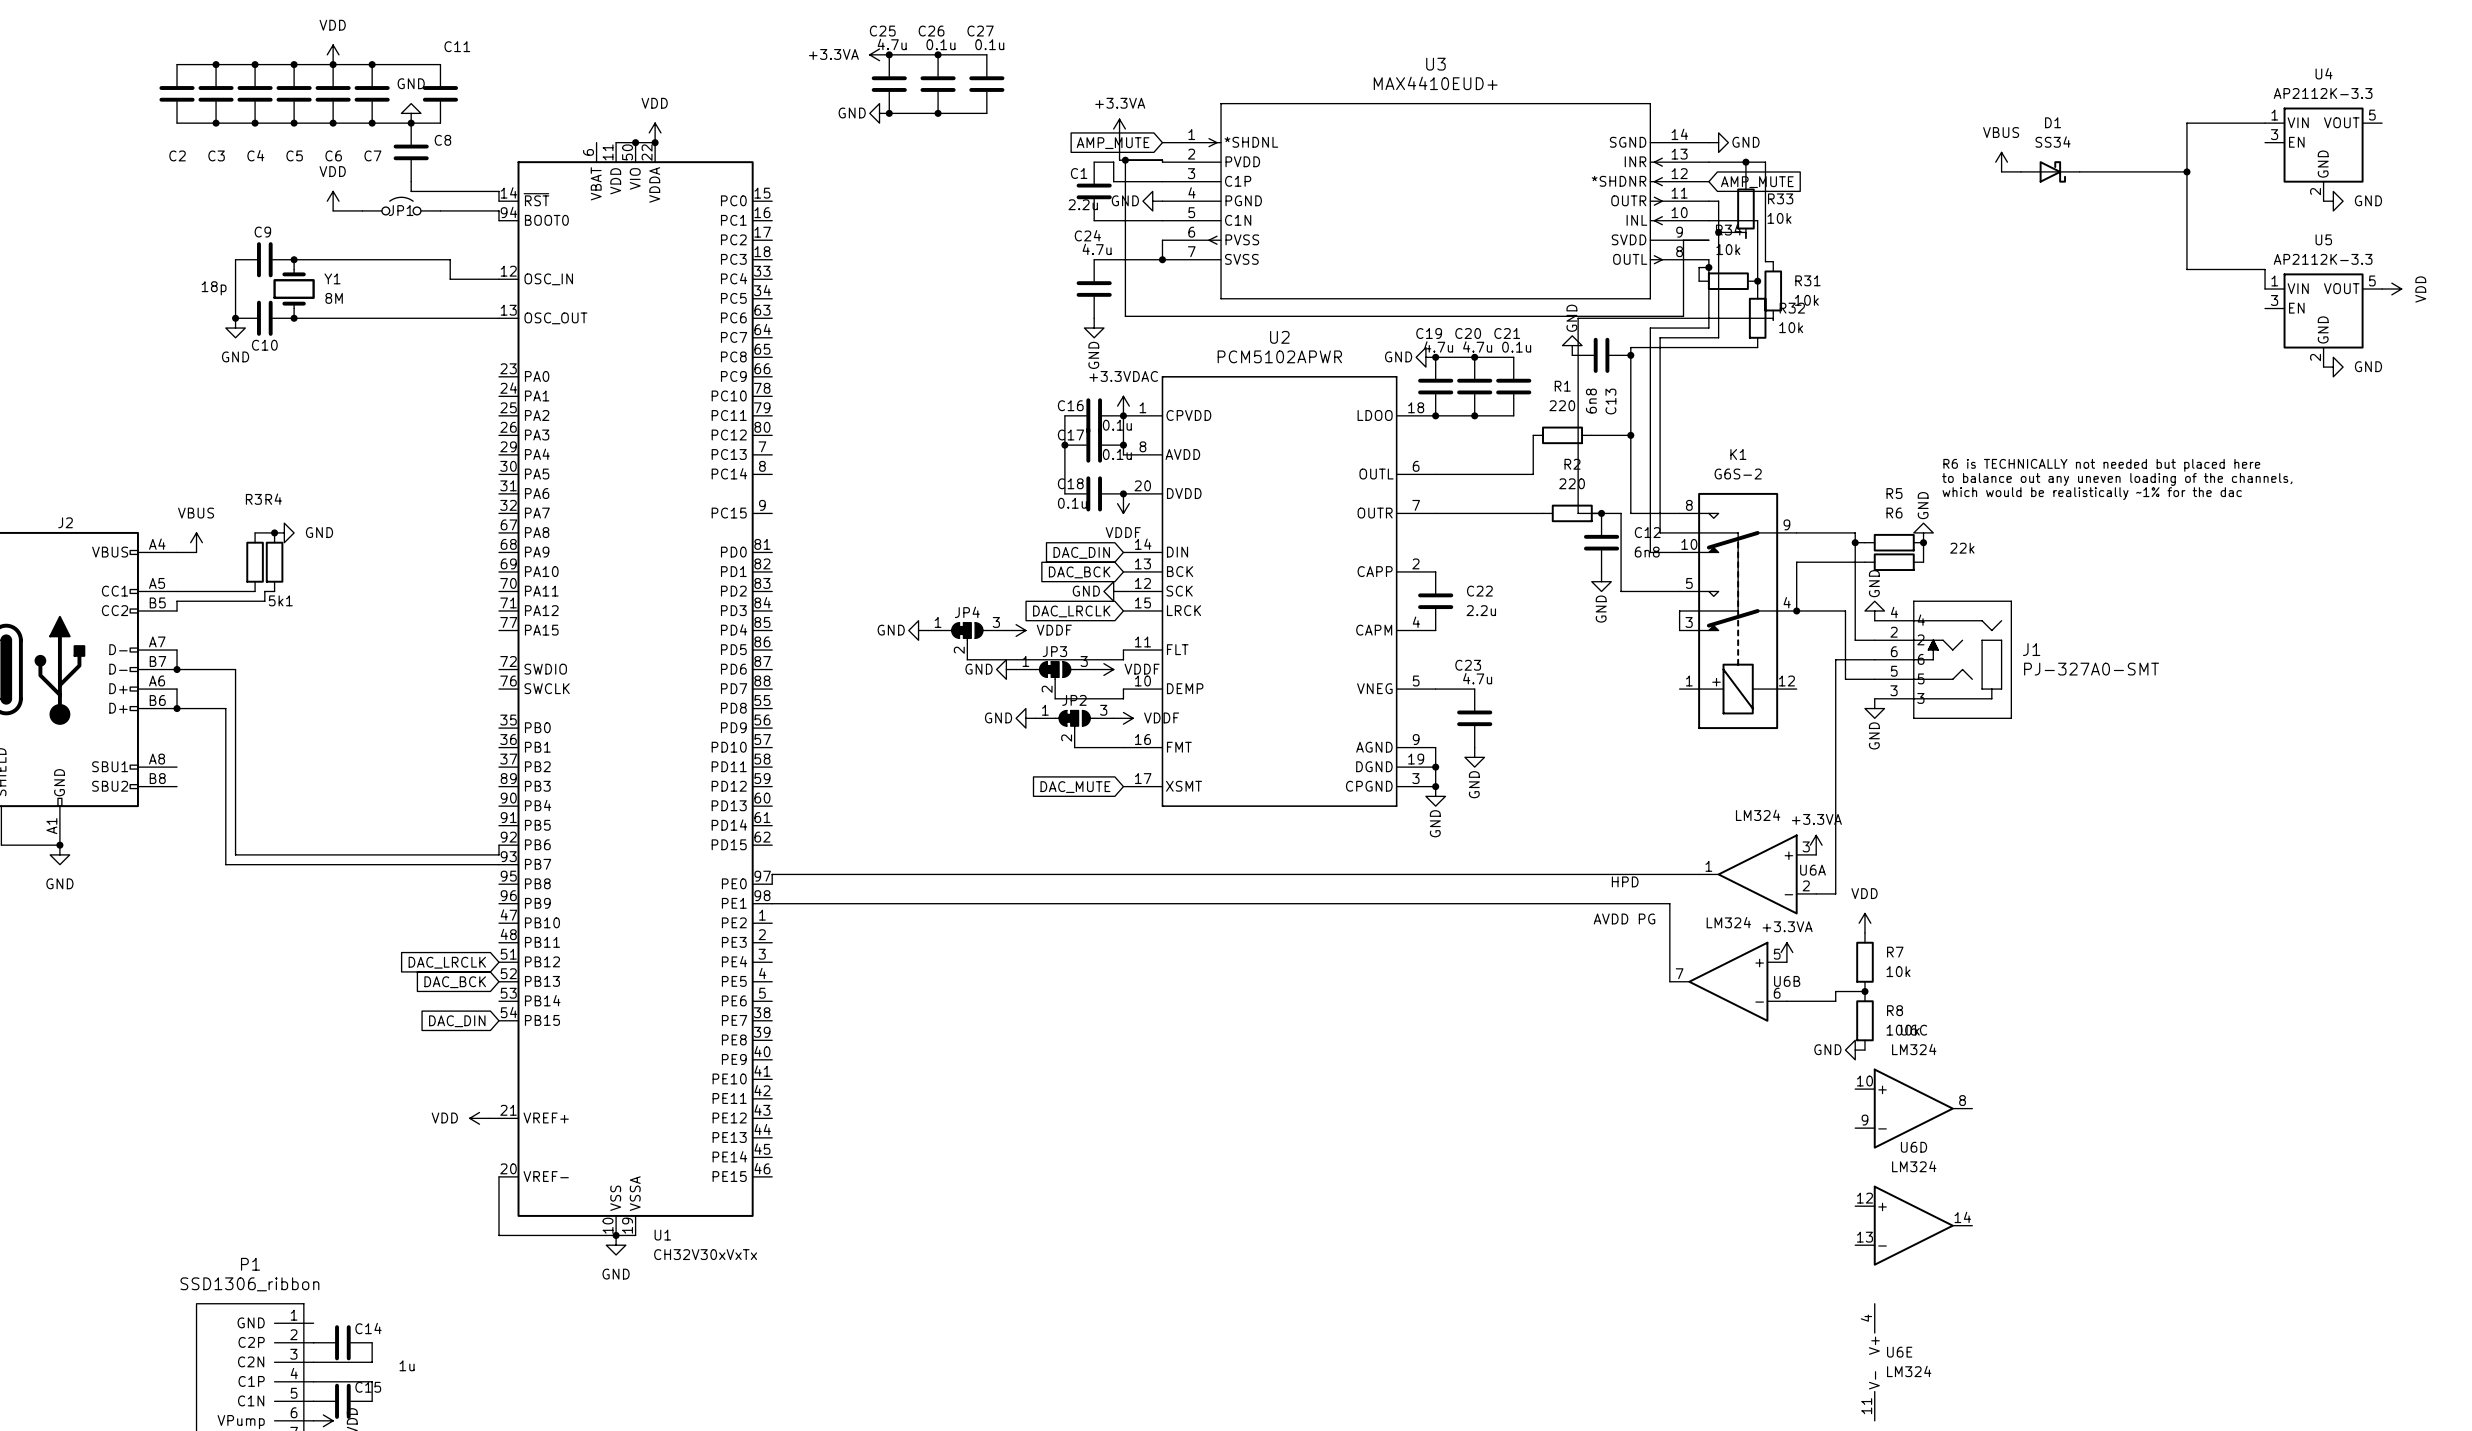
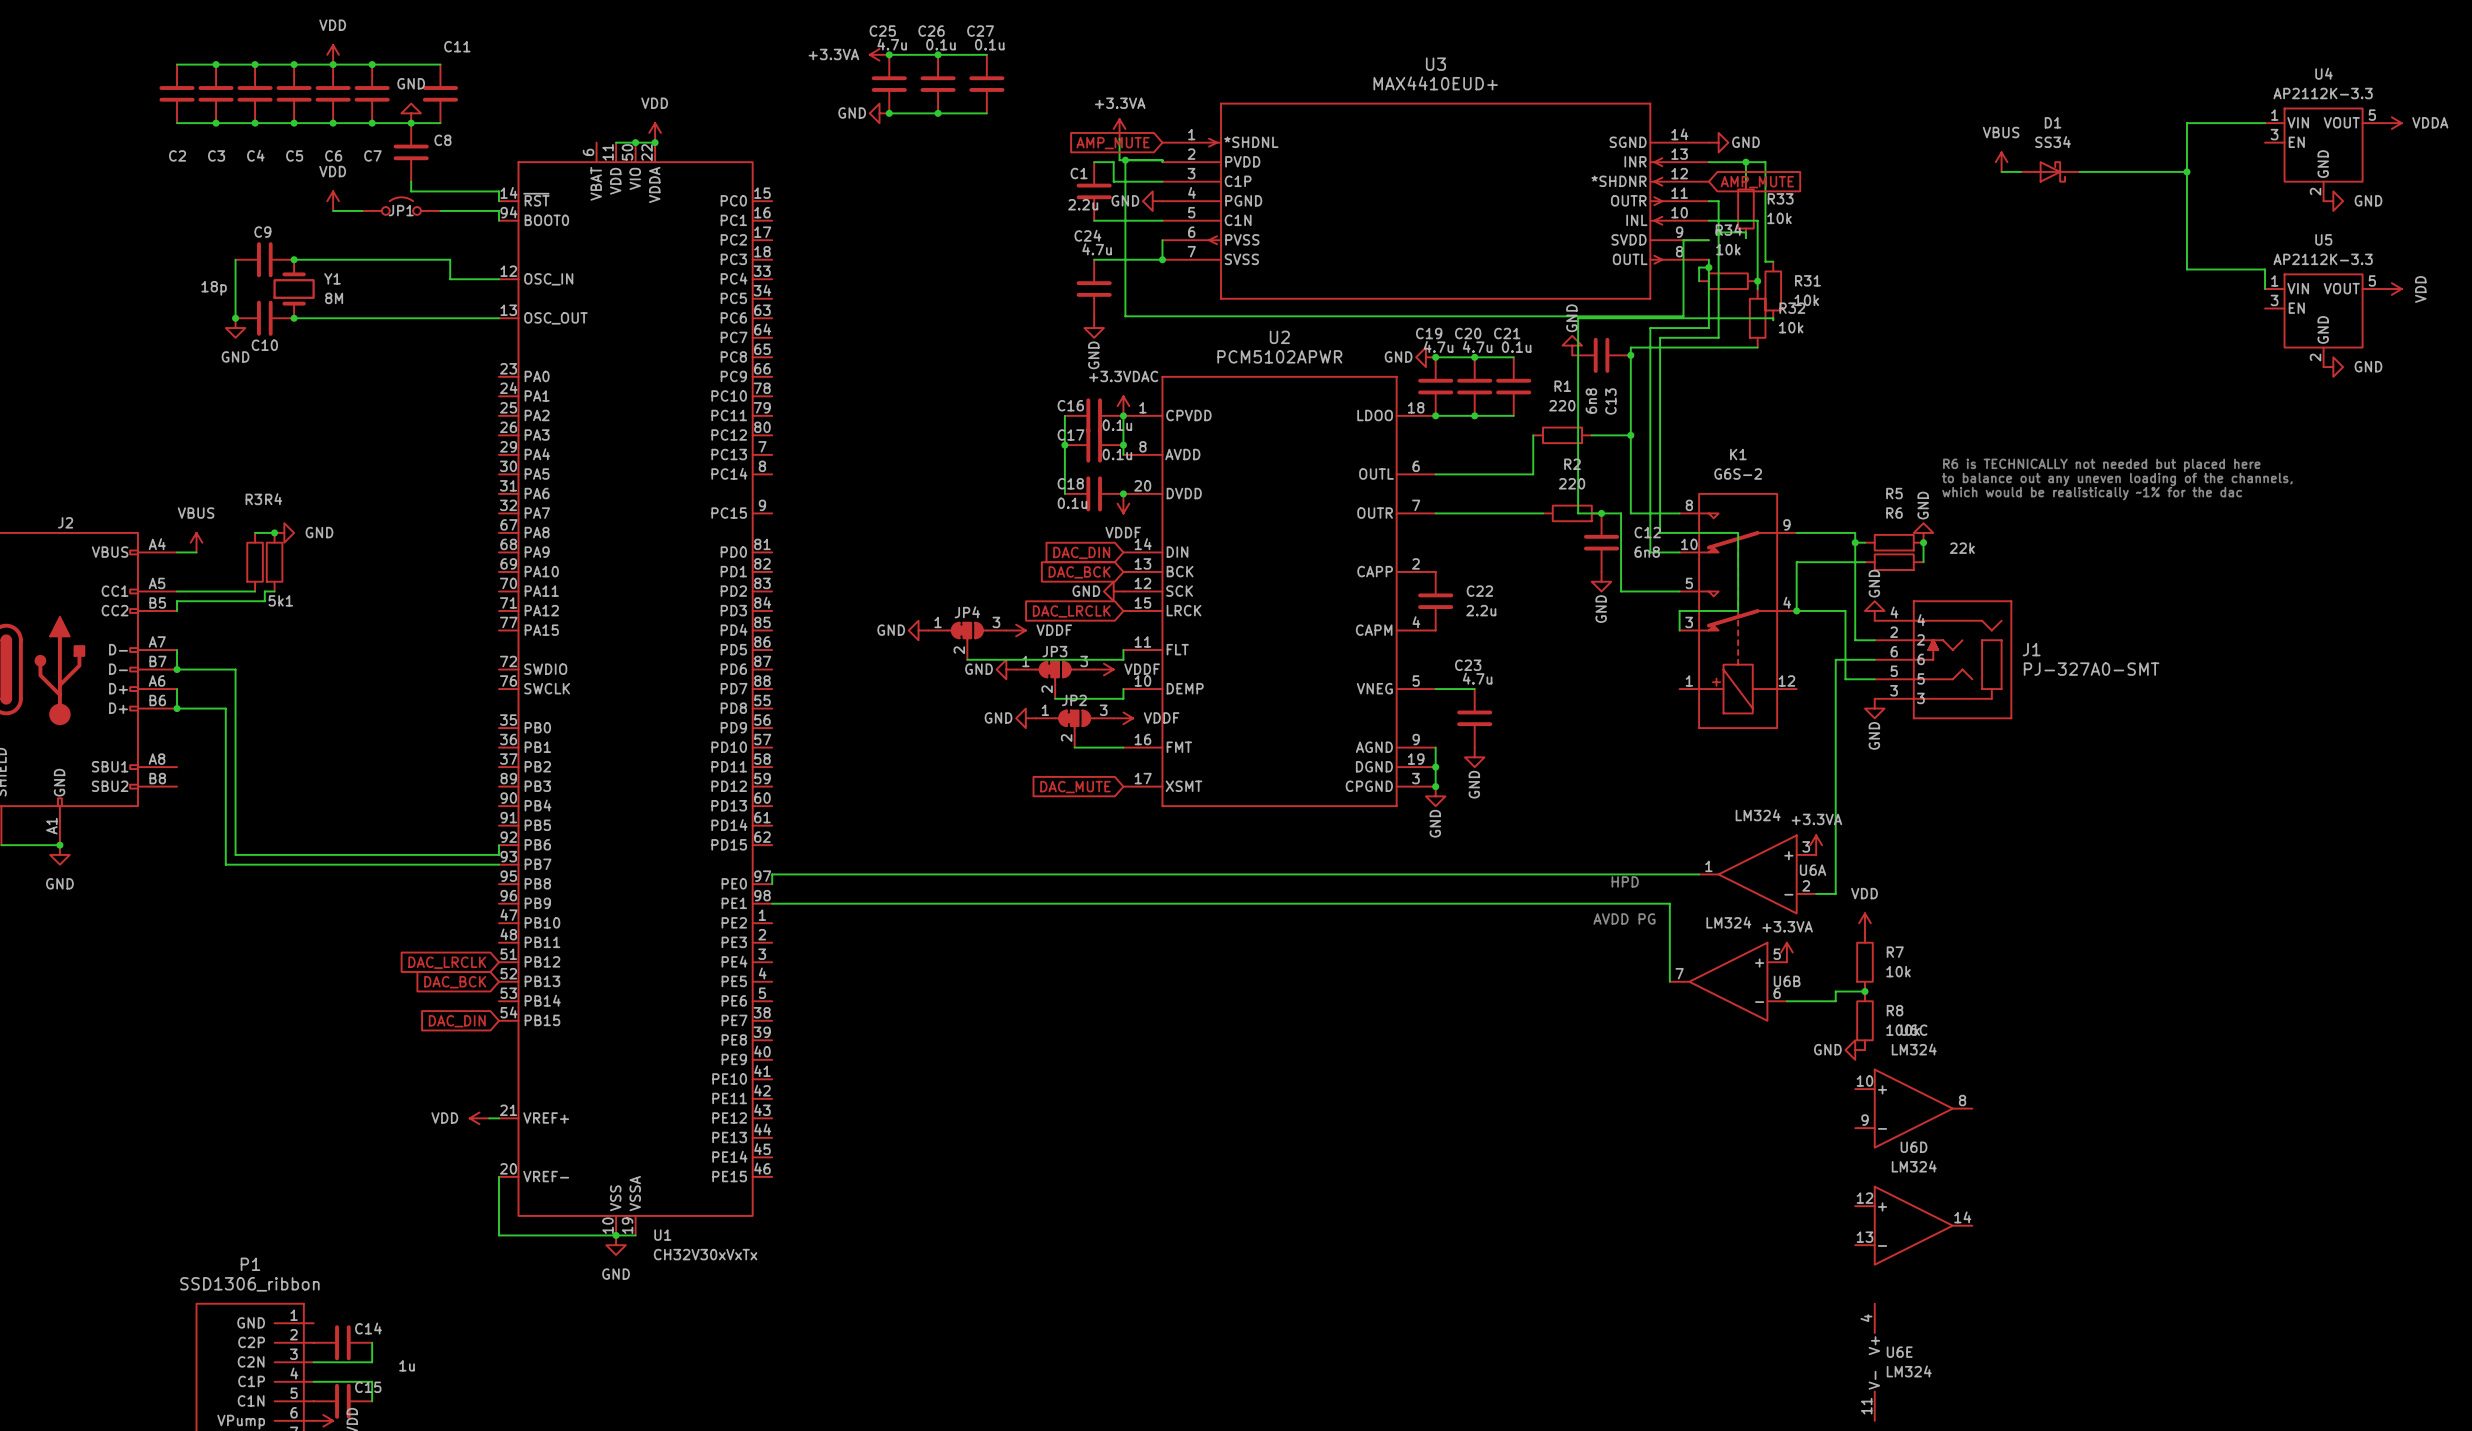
power symbol: none -> VDDA (2391, 123)

